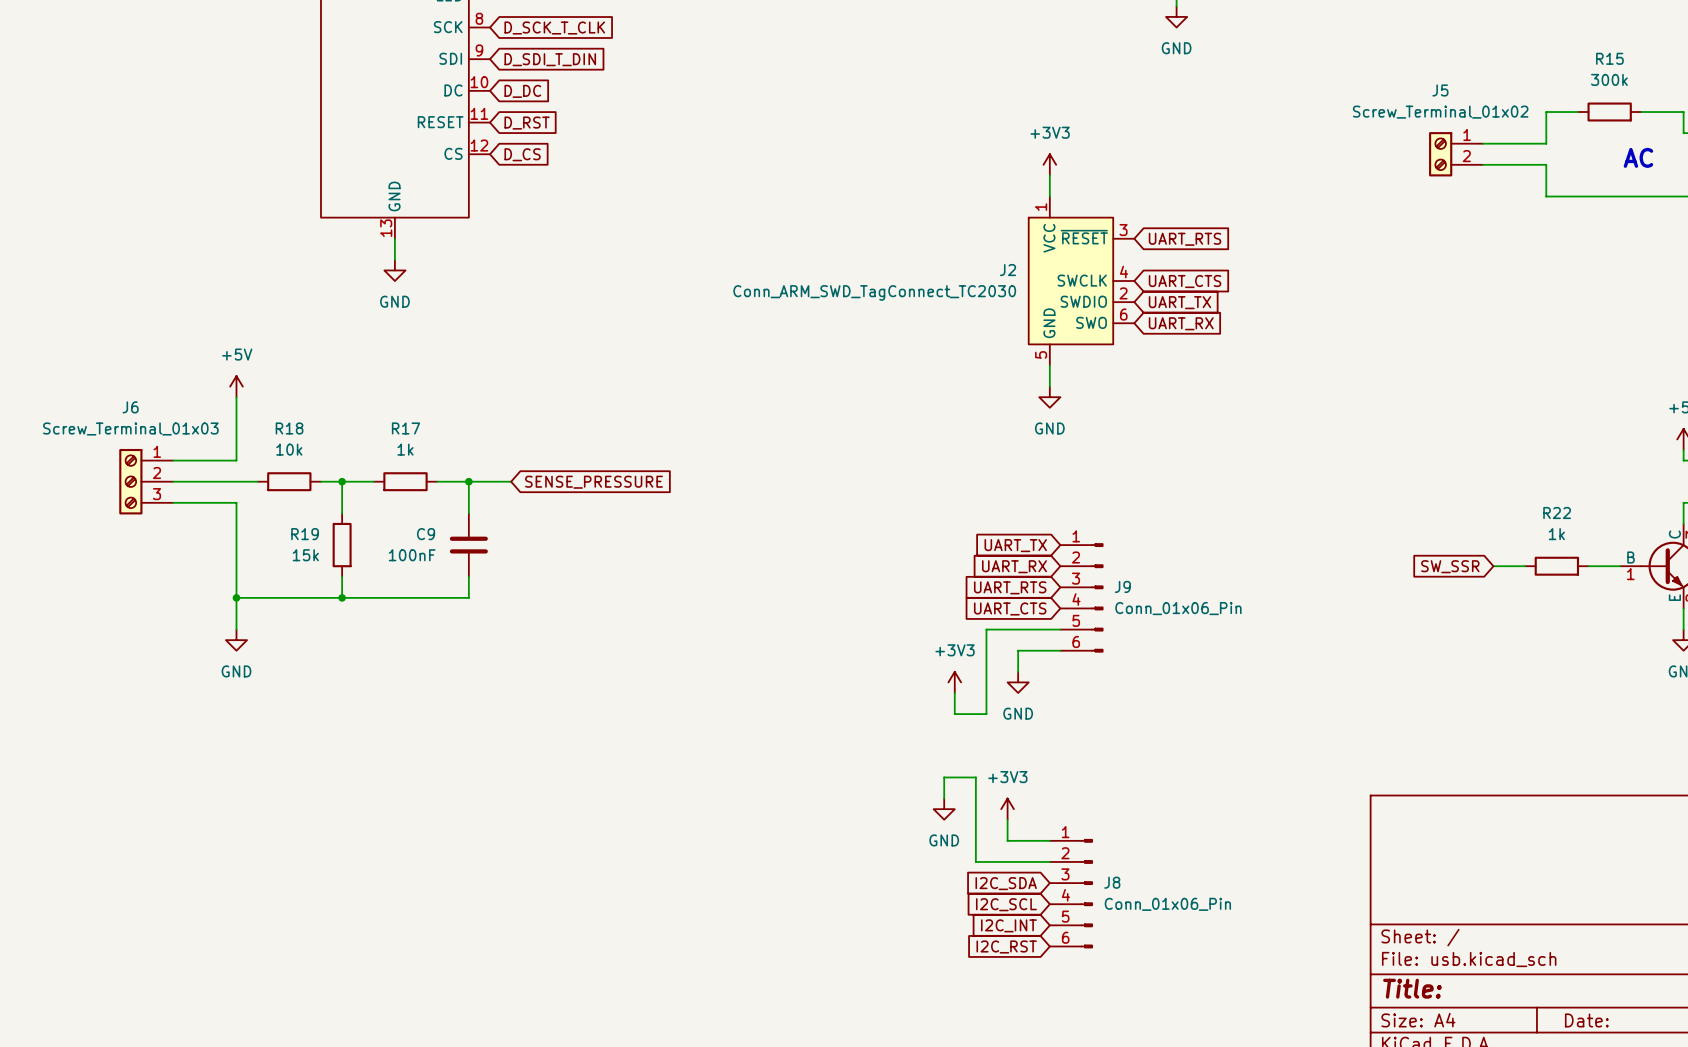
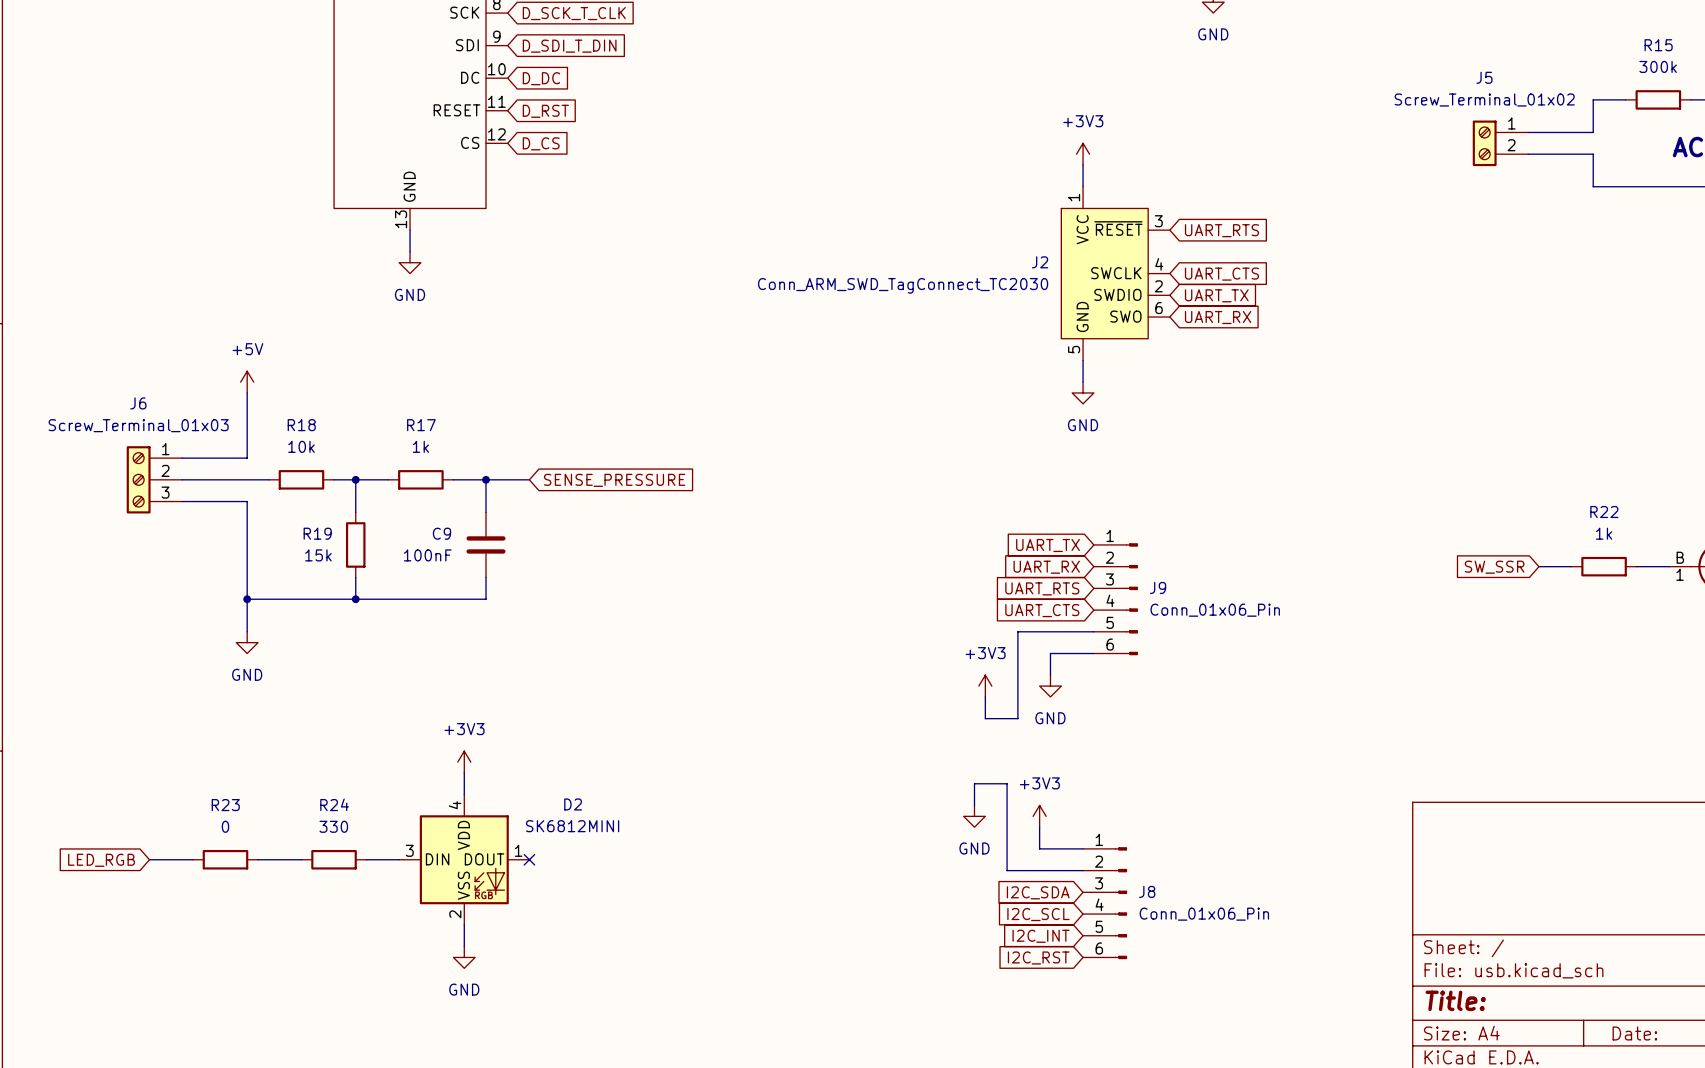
power symbol: none -> +3V3 (464, 762)
wire: none -> (464, 772) (464, 794)
global label: none -> LED_RGB (101, 860)
wire: none -> (149, 859) (192, 859)
R23: none -> 0 (225, 859)
wire: none -> (258, 859) (301, 859)
R24: none -> 330 (334, 859)
wire: none -> (366, 859) (399, 859)
D2: none -> SK6812MINI (464, 859)
no-connect mark: none -> (529, 859)
wire: none -> (464, 924) (464, 946)
power symbol: none -> GND (464, 957)

